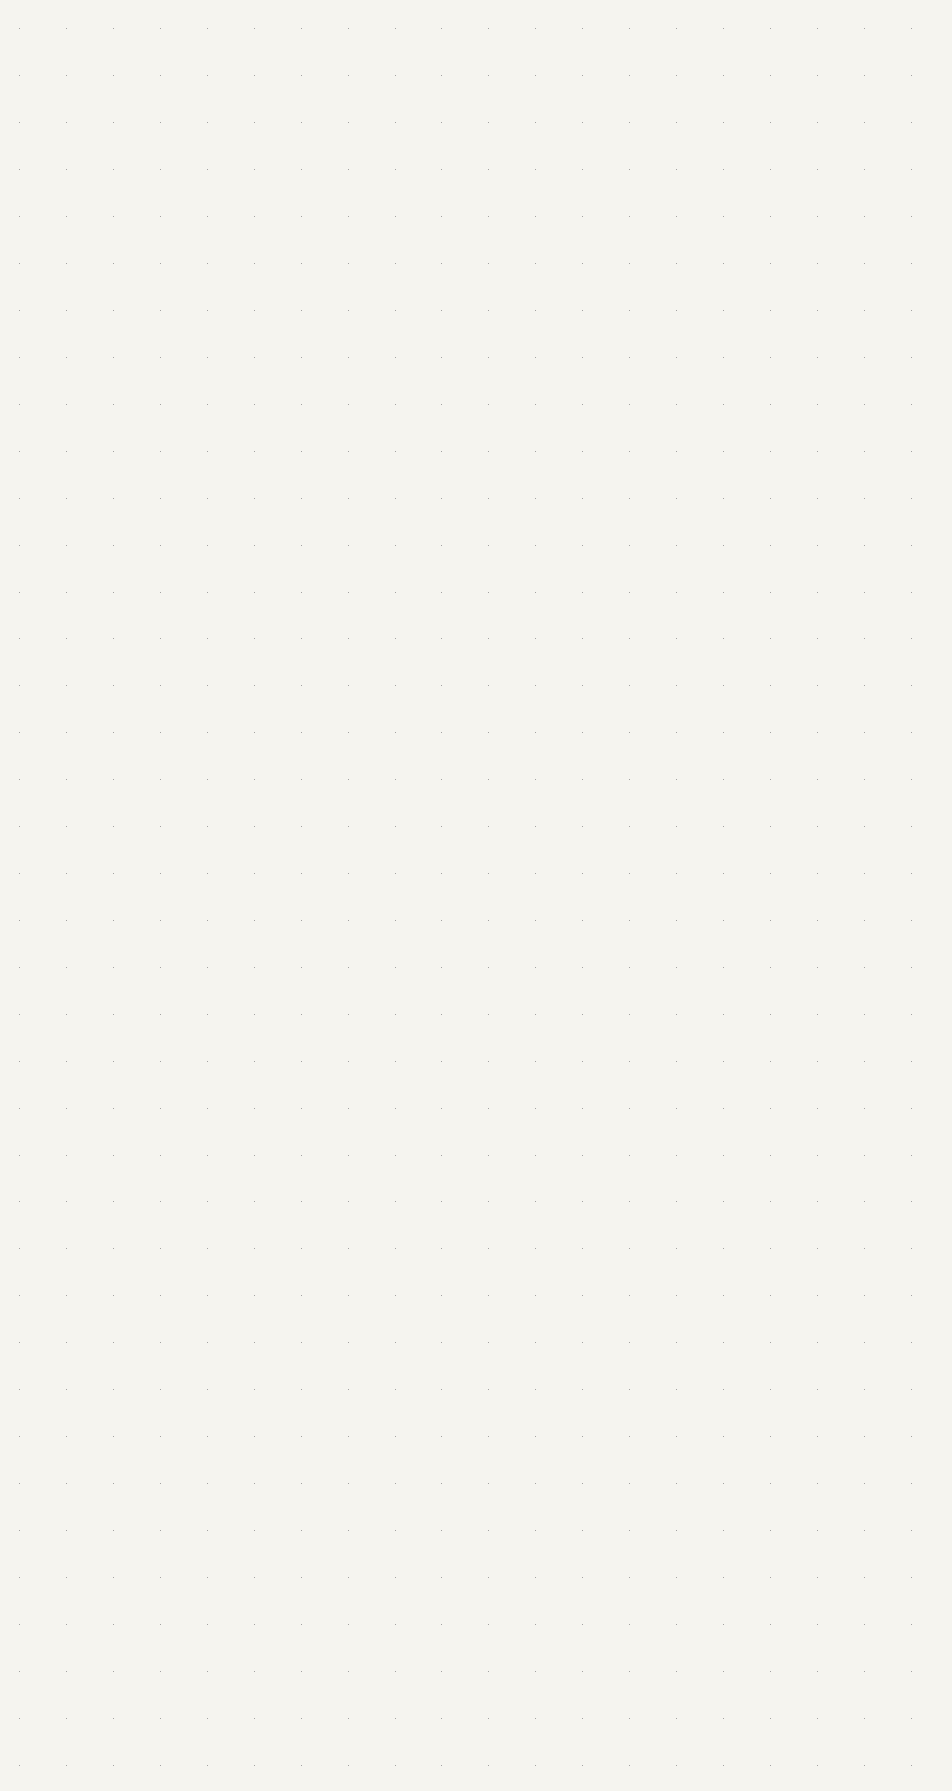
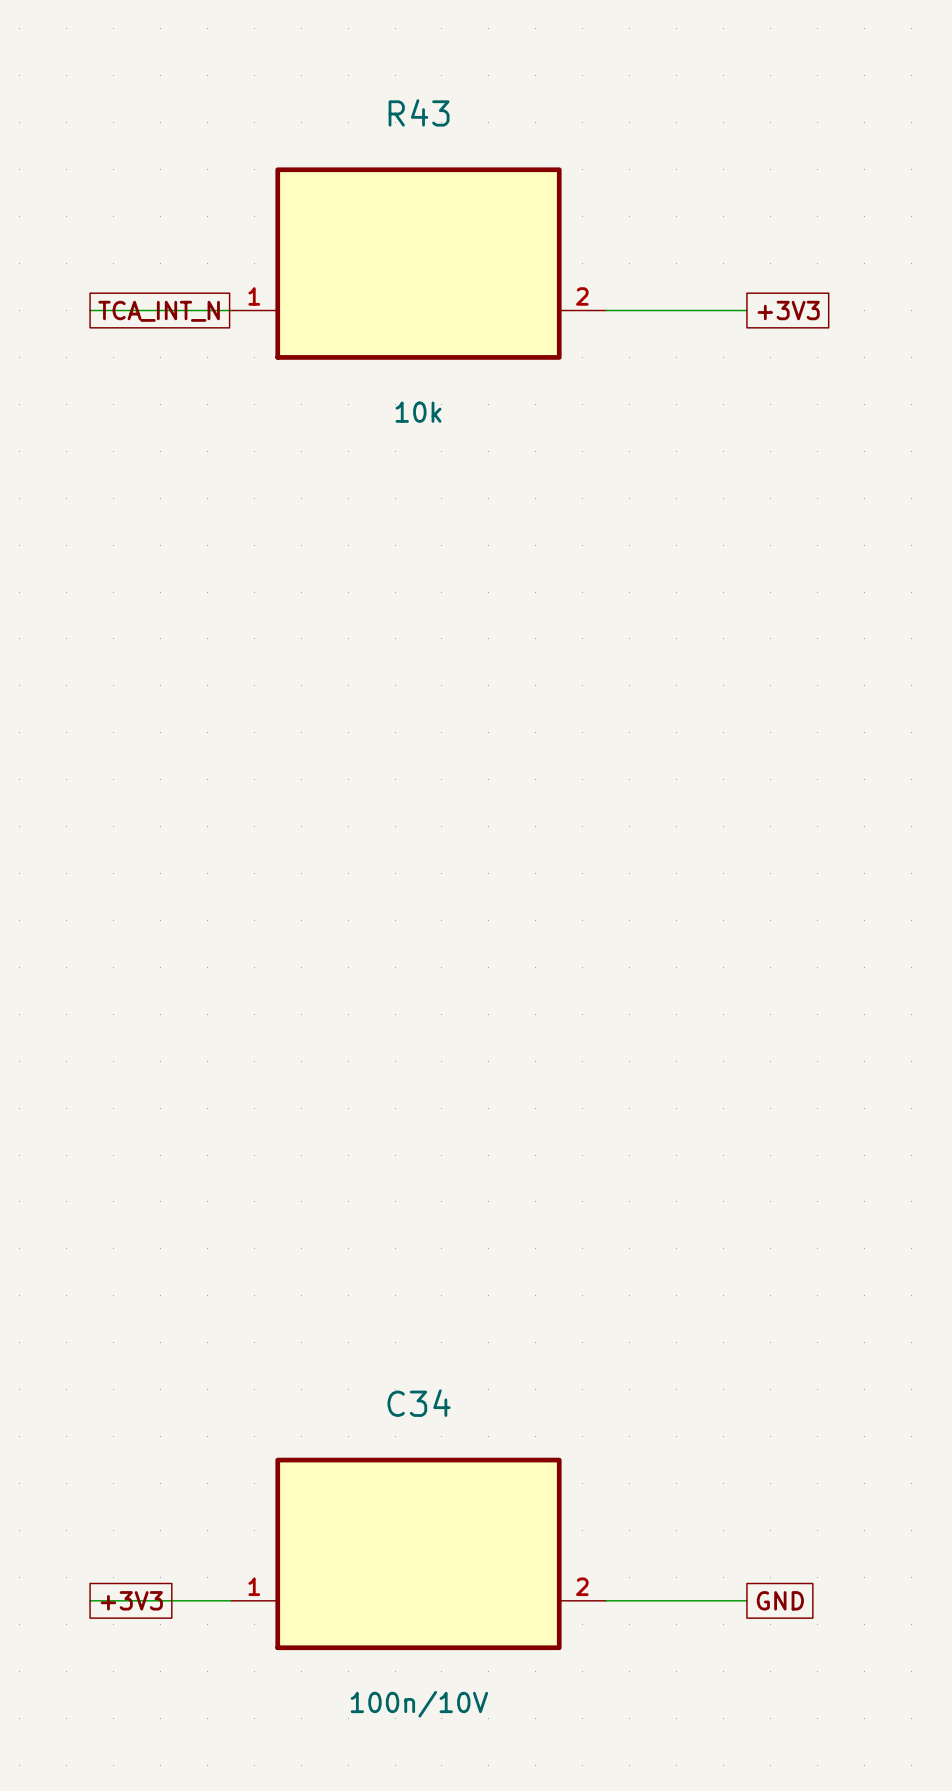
R43: none -> 10k (418, 263)
wire: none -> (90, 310) (230, 310)
wire: none -> (606, 310) (746, 310)
global label: none -> +3V3 (788, 310)
global label: none -> TCA_INT_N (159, 311)
C34: none -> 100n/10V (418, 1553)
wire: none -> (90, 1600) (230, 1600)
global label: none -> +3V3 (131, 1600)
wire: none -> (606, 1600) (746, 1600)
global label: none -> GND (780, 1600)

